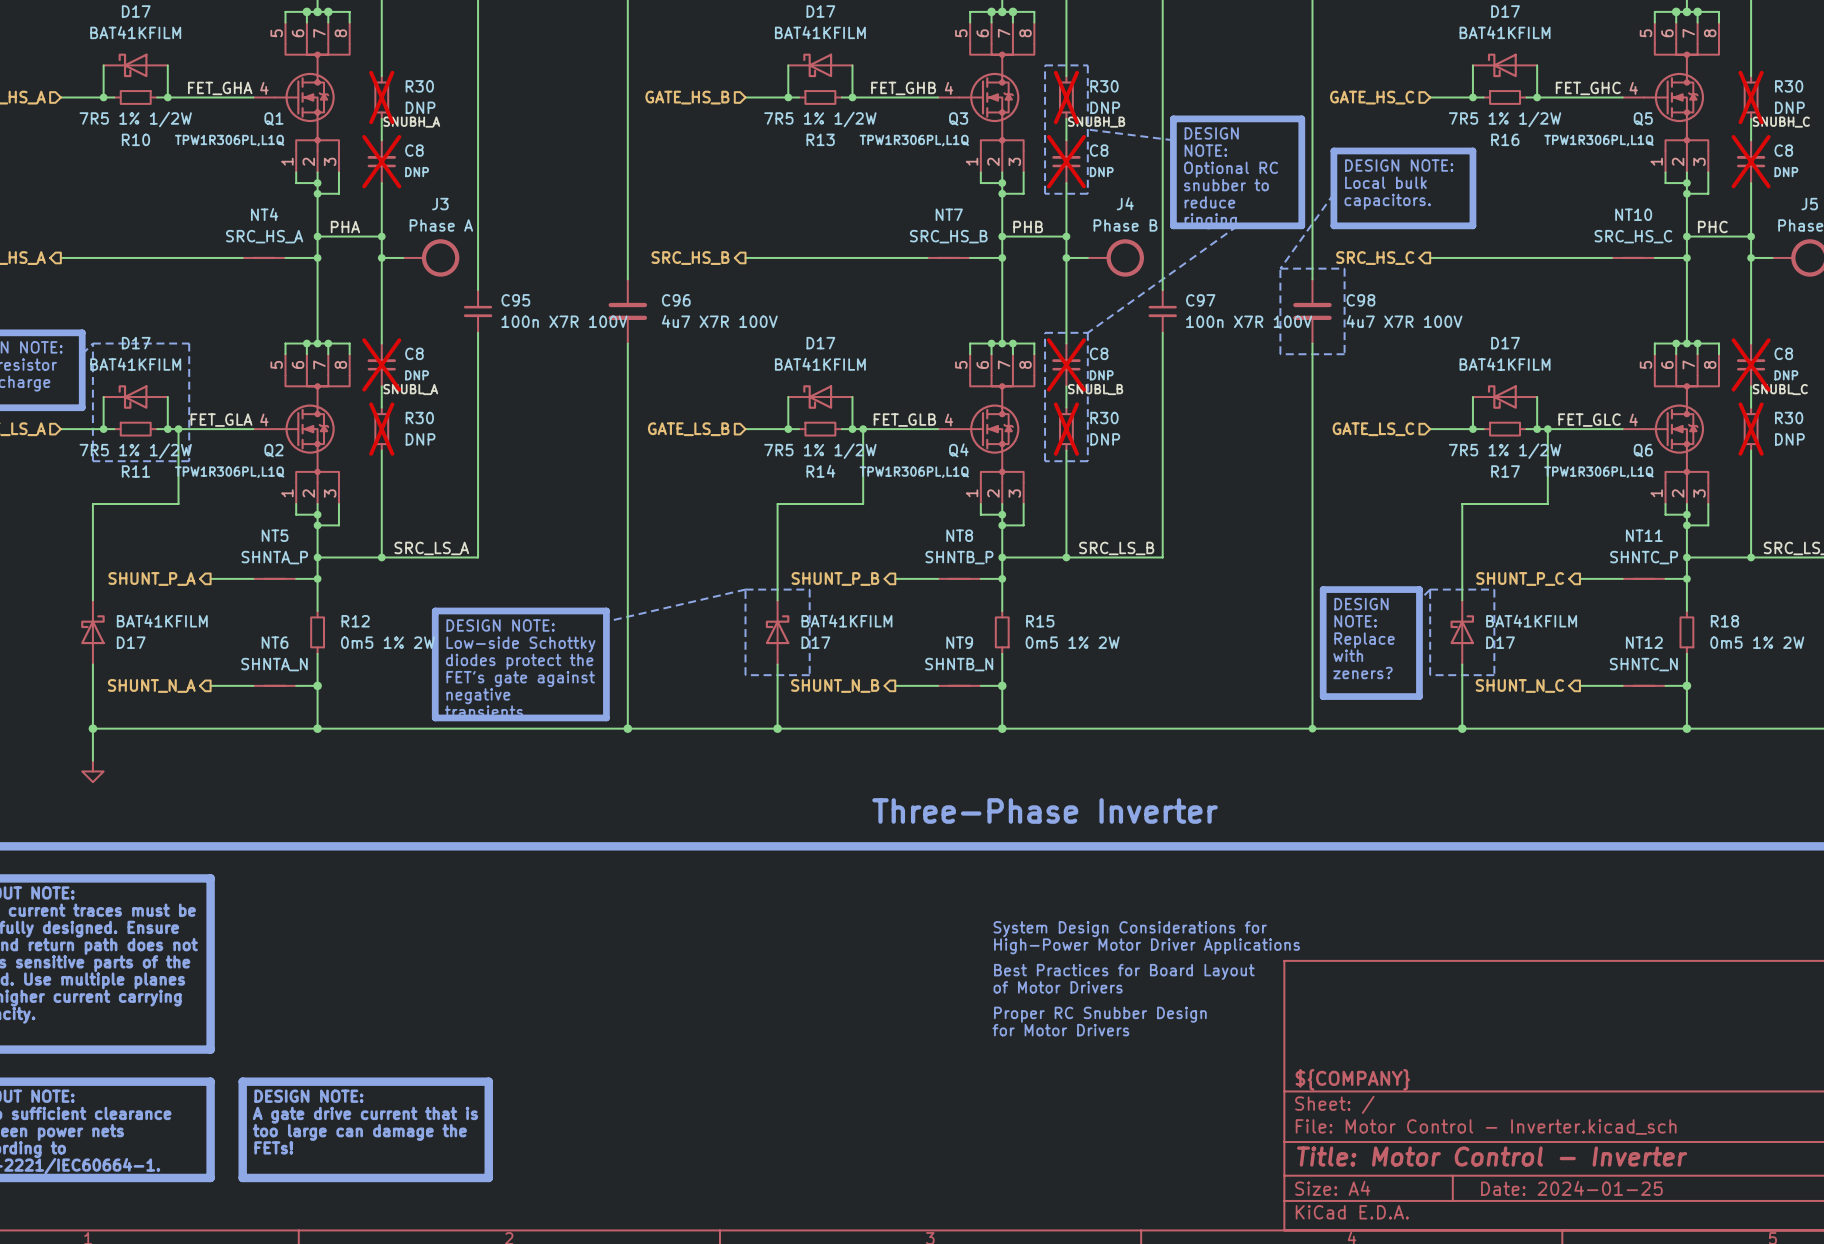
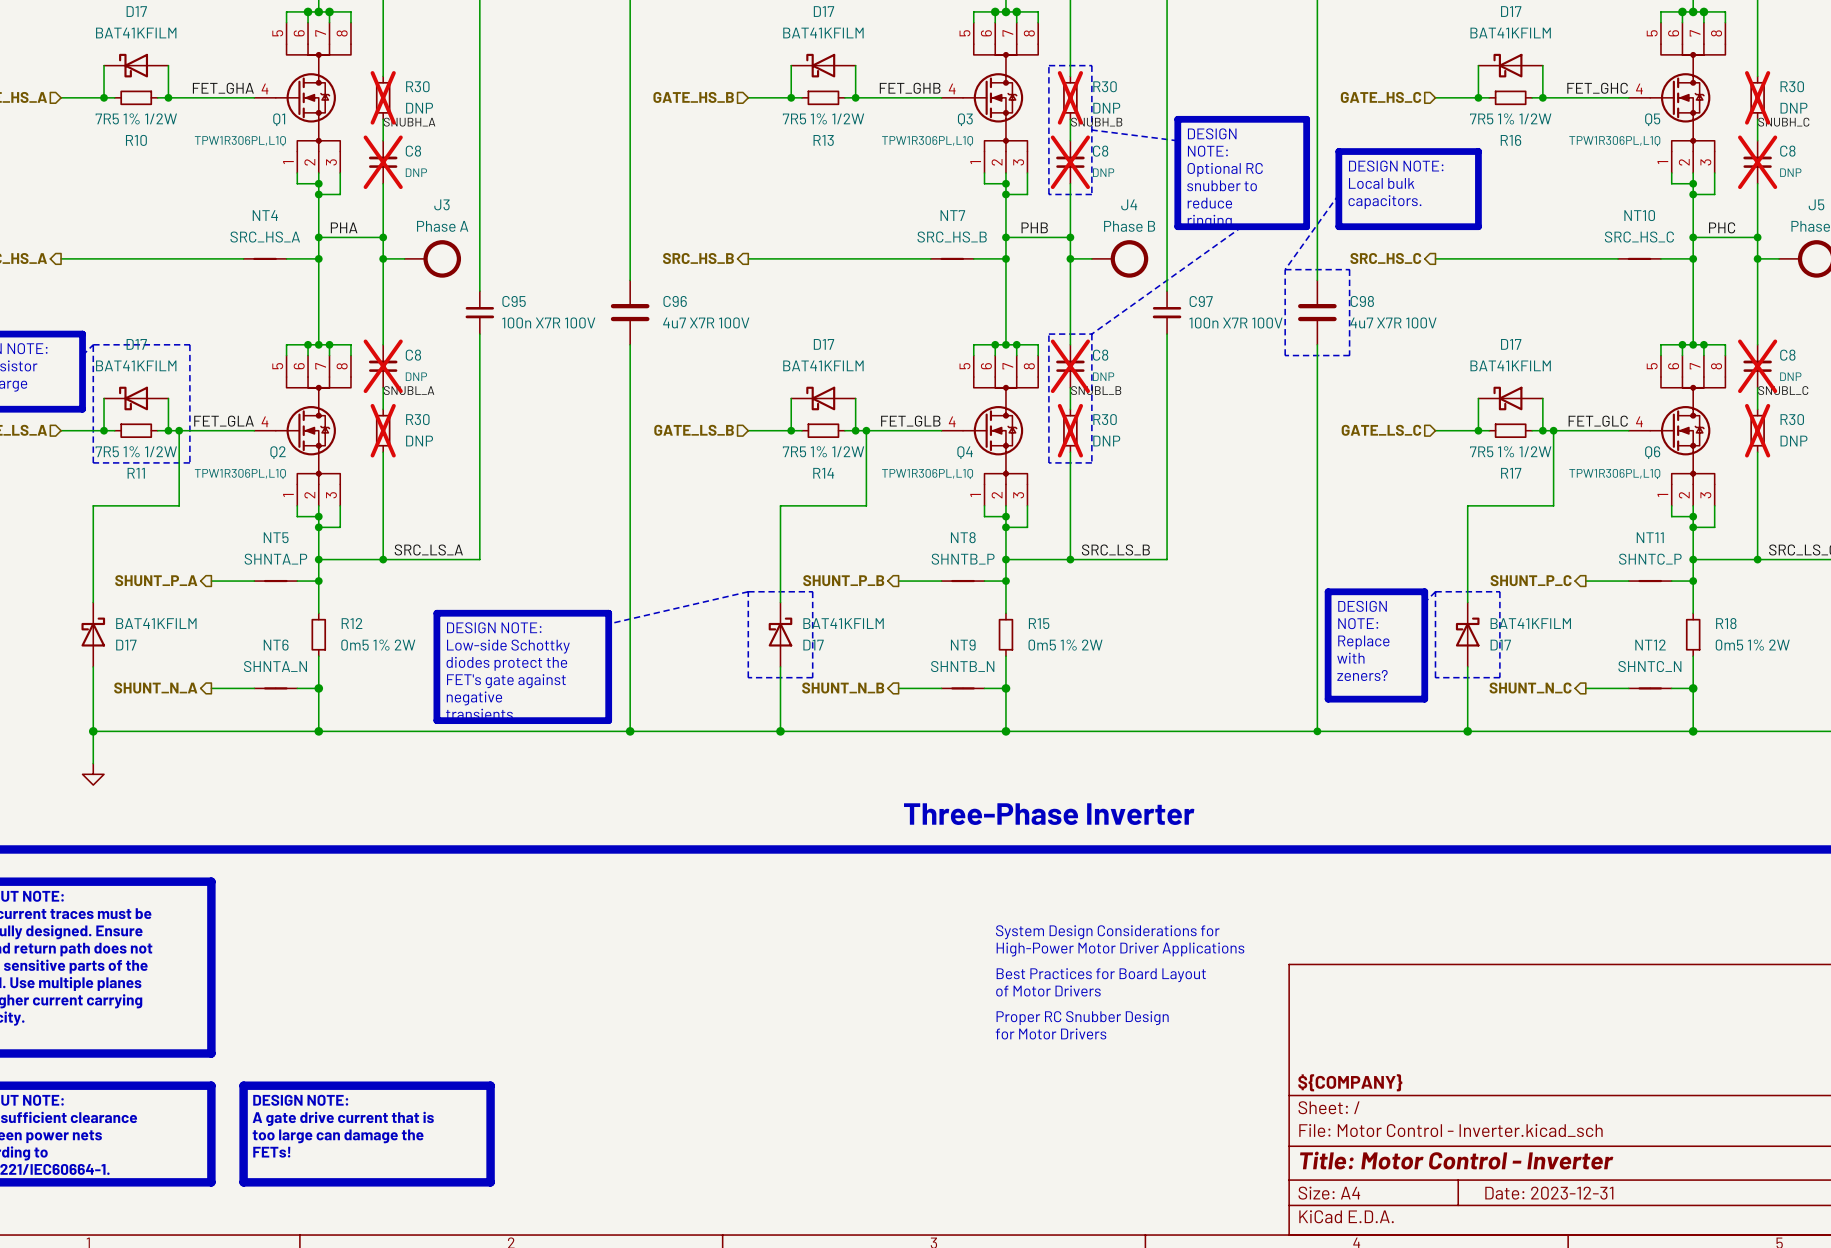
title block: Date: 2024-01-25 (1571, 1188) -> Date: 2023-12-31 (1549, 1193)

